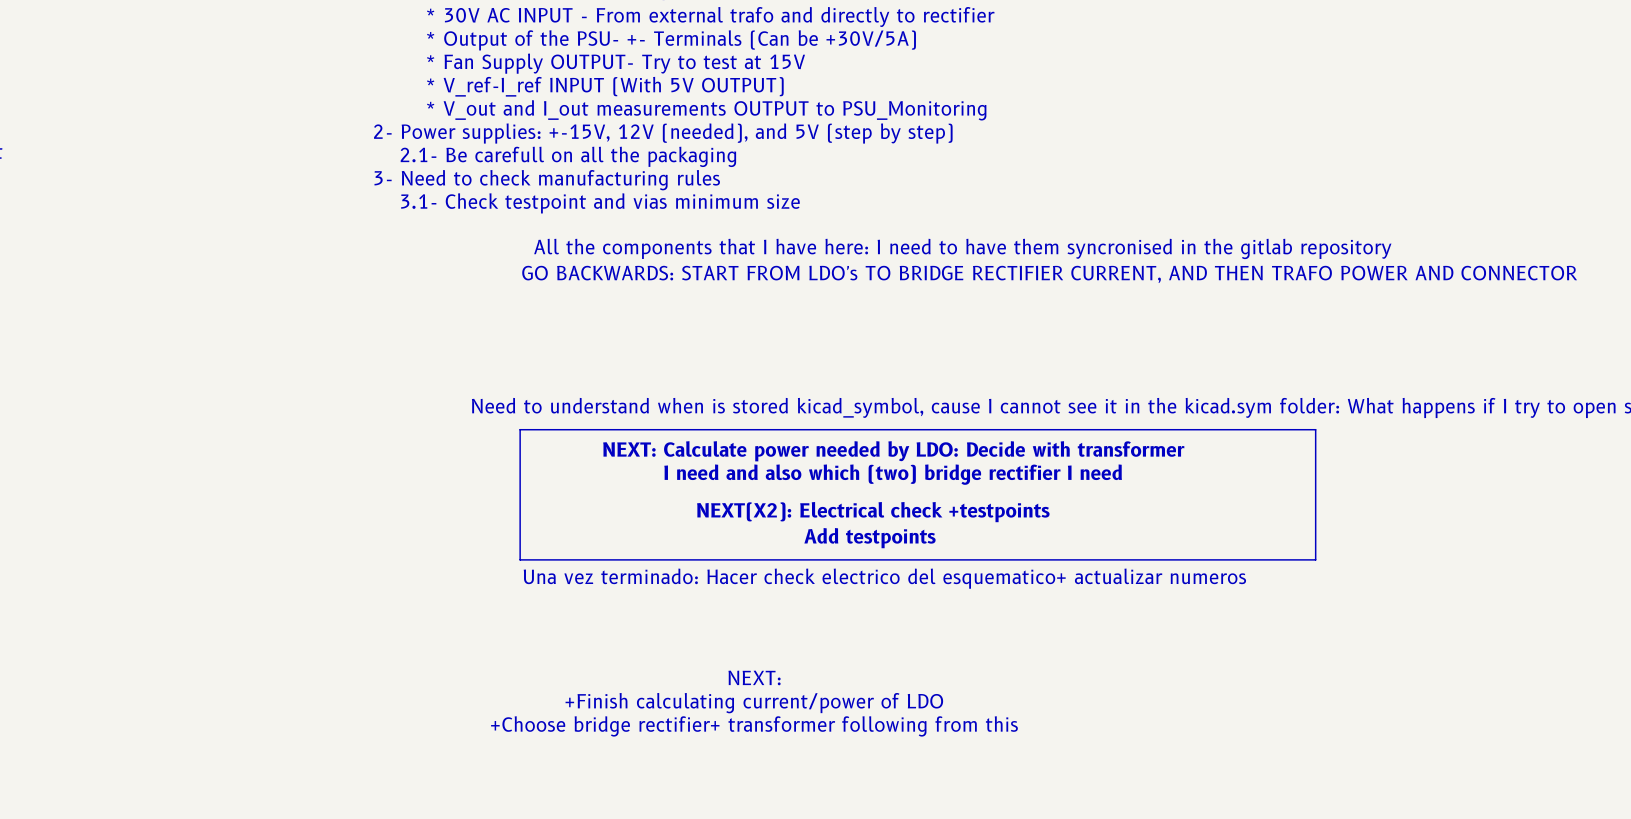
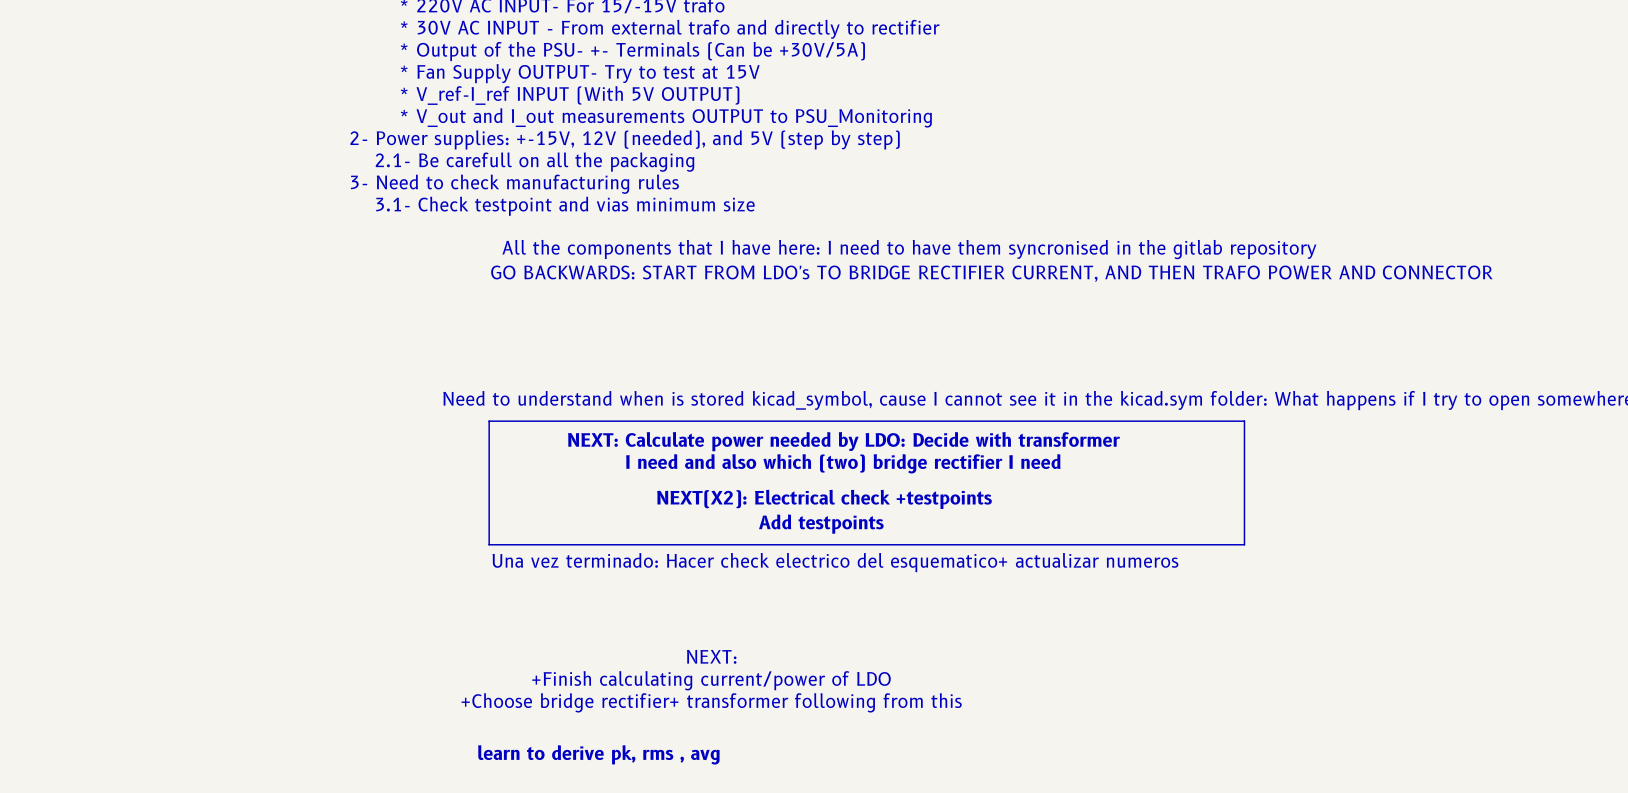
text: none -> learn to derive pk, rms , avg (598, 754)

